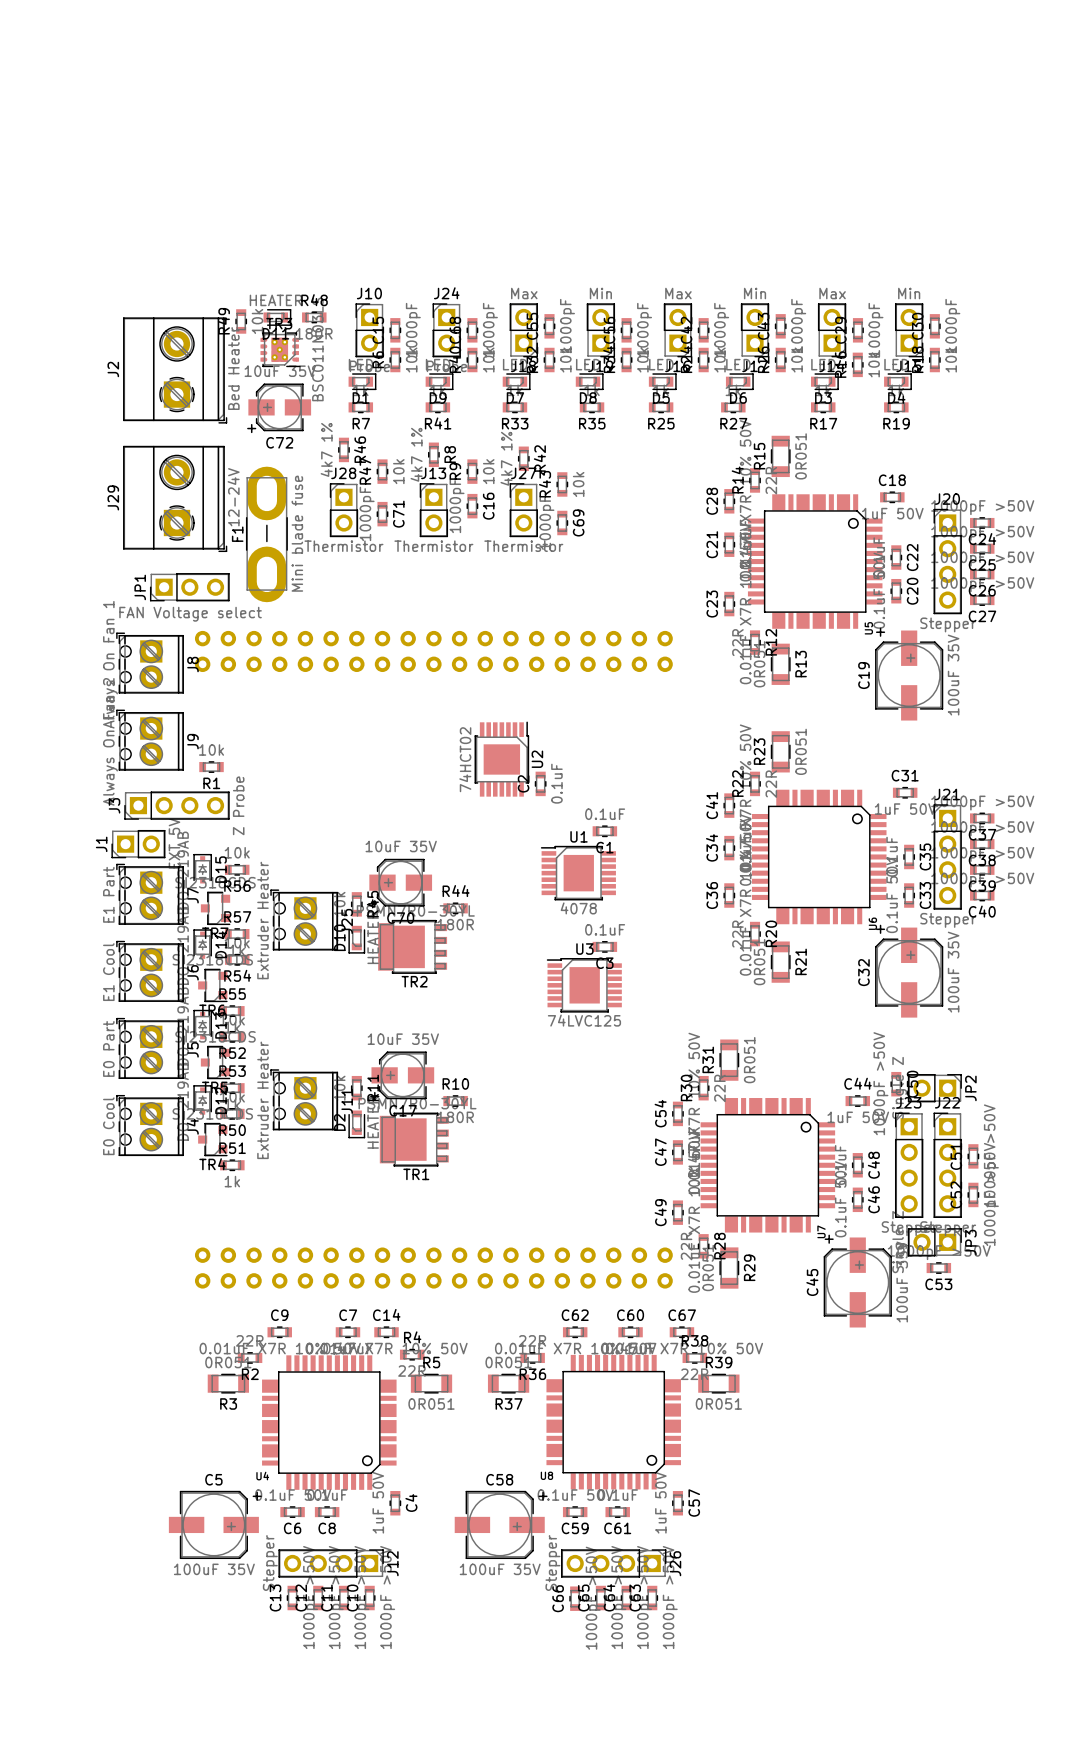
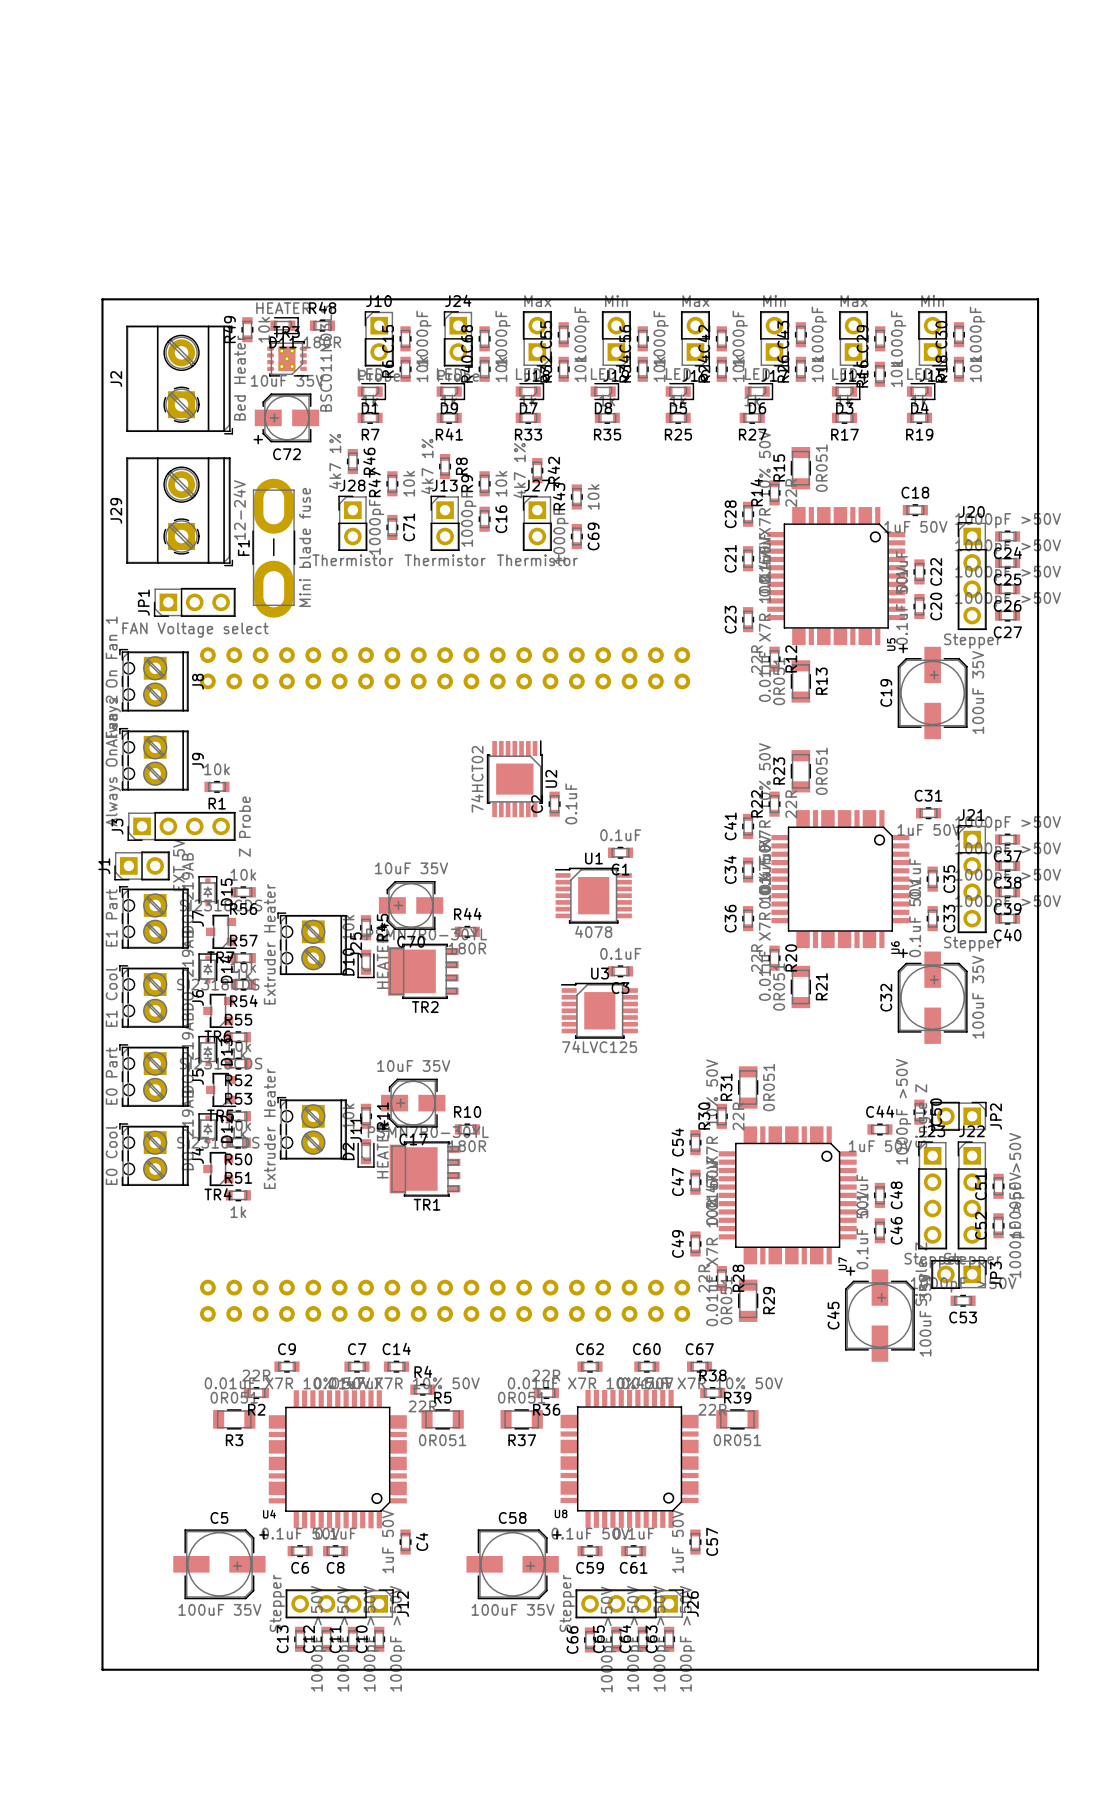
board edge: none -> (102, 299) (102, 1669) (1038, 1669) (1038, 299) (102, 299)

